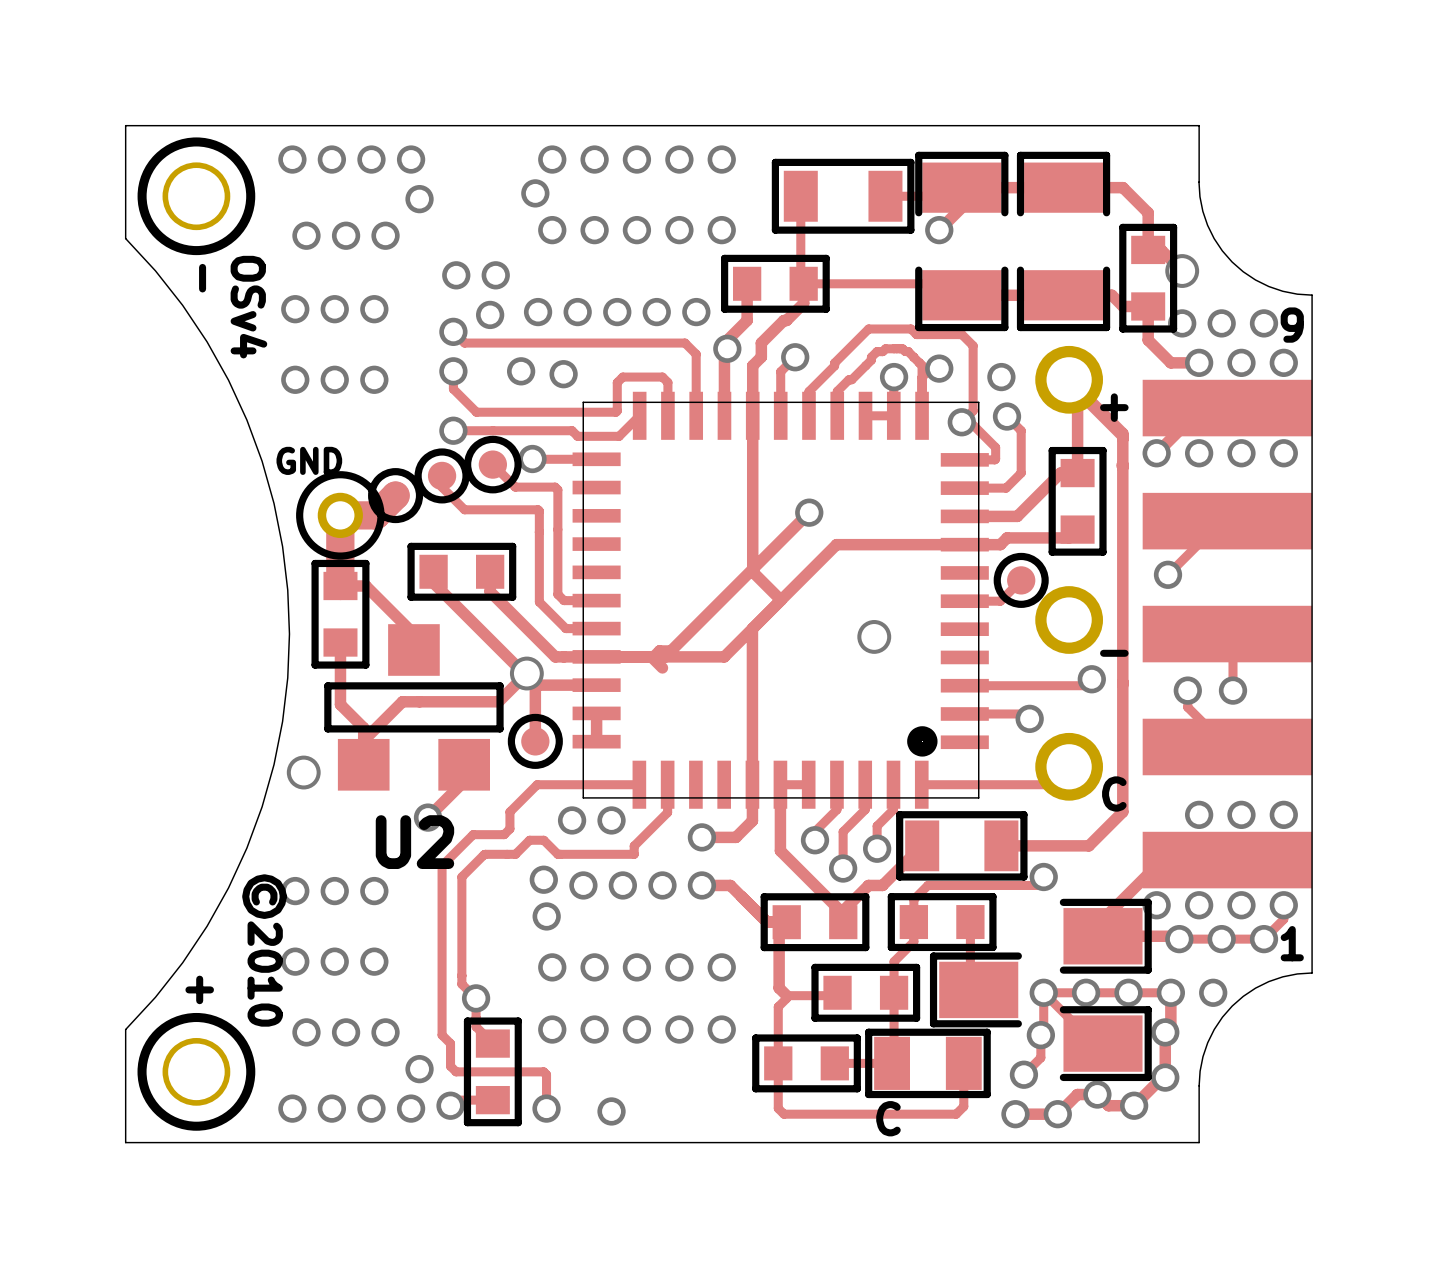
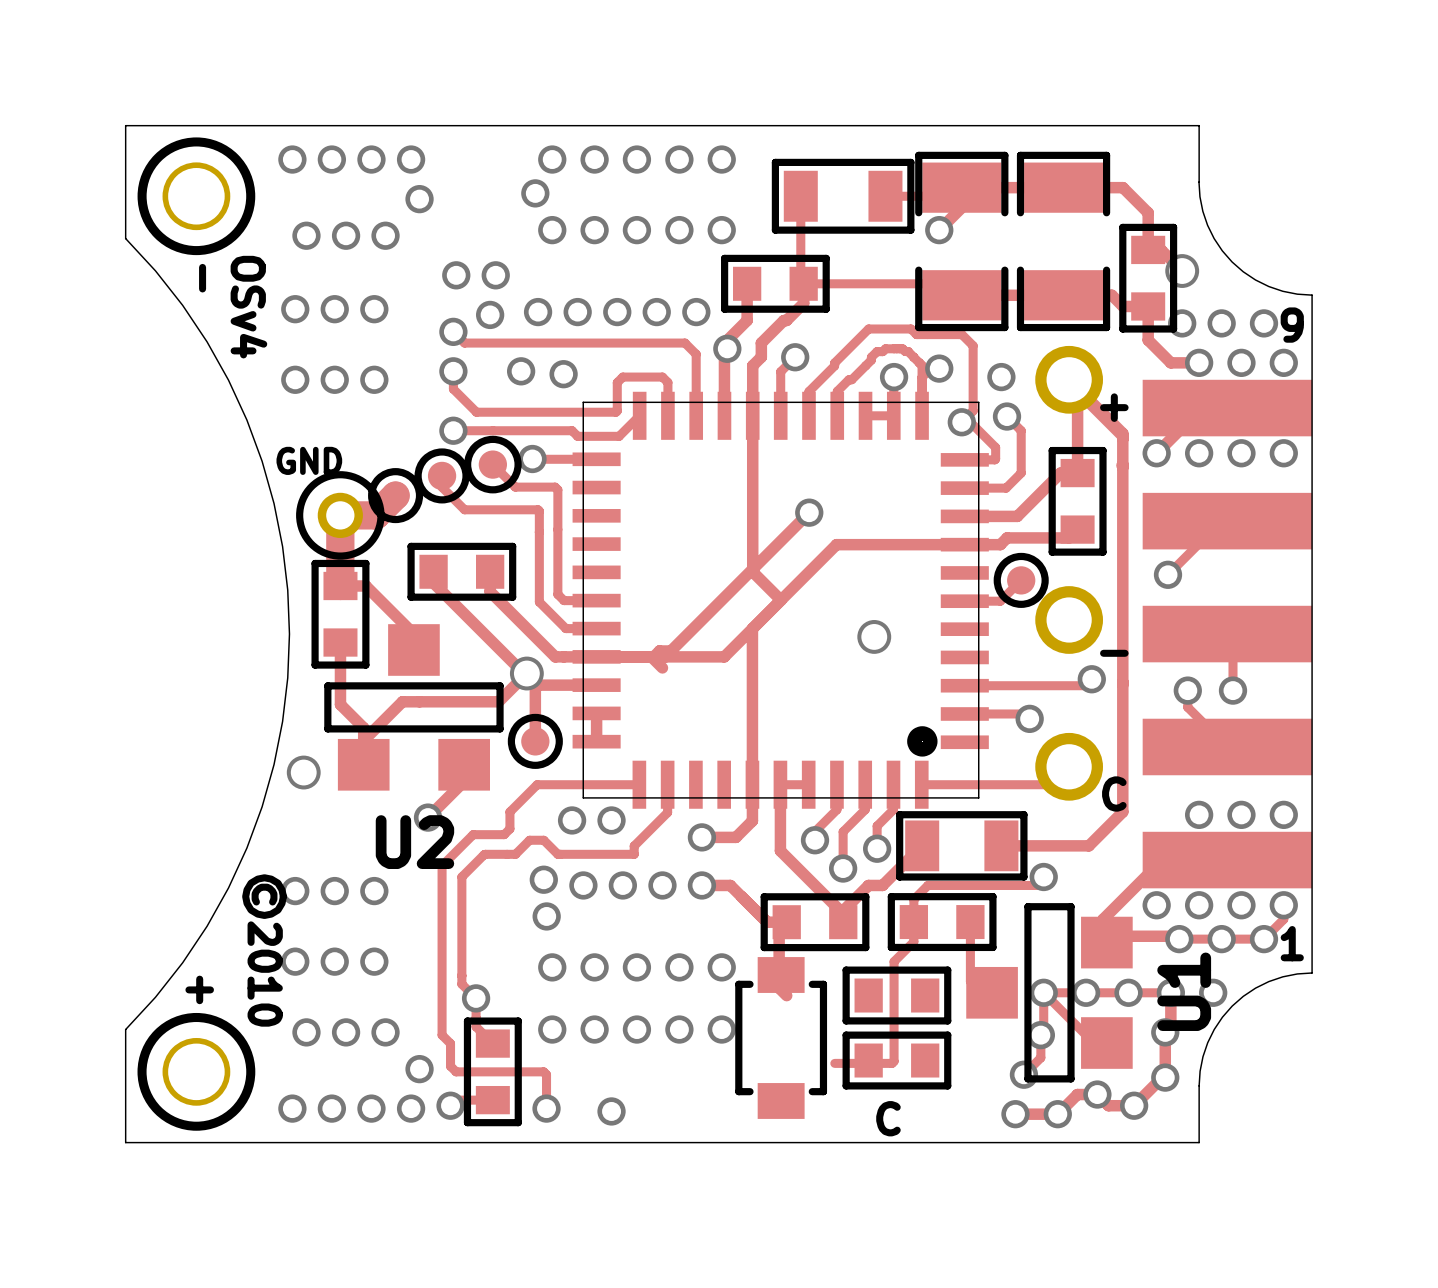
part: (1040, 989) -> none
track: (837, 992) (834, 995) (786, 995) (786, 998) (778, 1006) (778, 1108) (784, 1114) (956, 1114) (963, 1106) (963, 1063) -> none
part position: (865, 992) -> (896, 995)
U1: none -> (1049, 992)
part footprint: [865, 1028, 991, 1099] -> [842, 1031, 952, 1090]
part footprint: [752, 1034, 861, 1093] -> [735, 957, 828, 1119]

